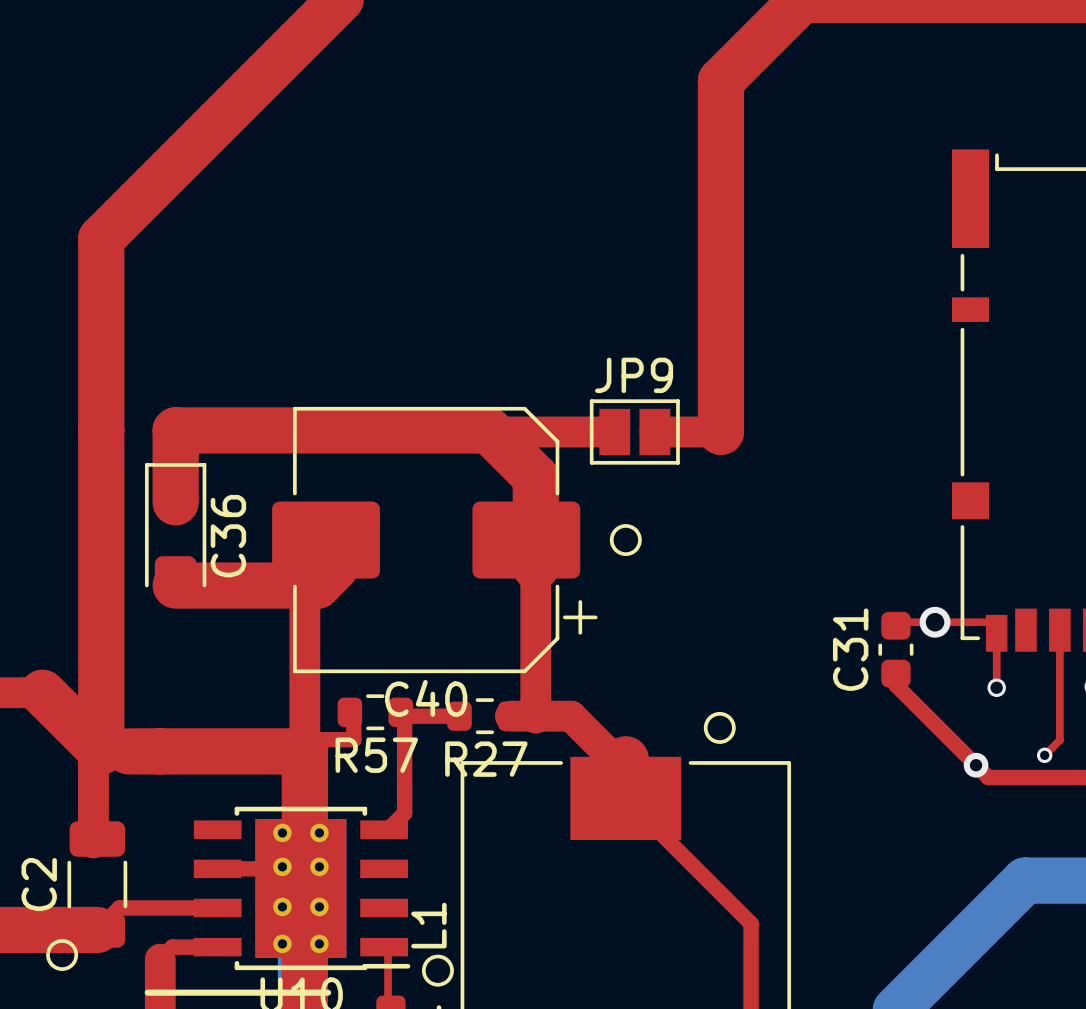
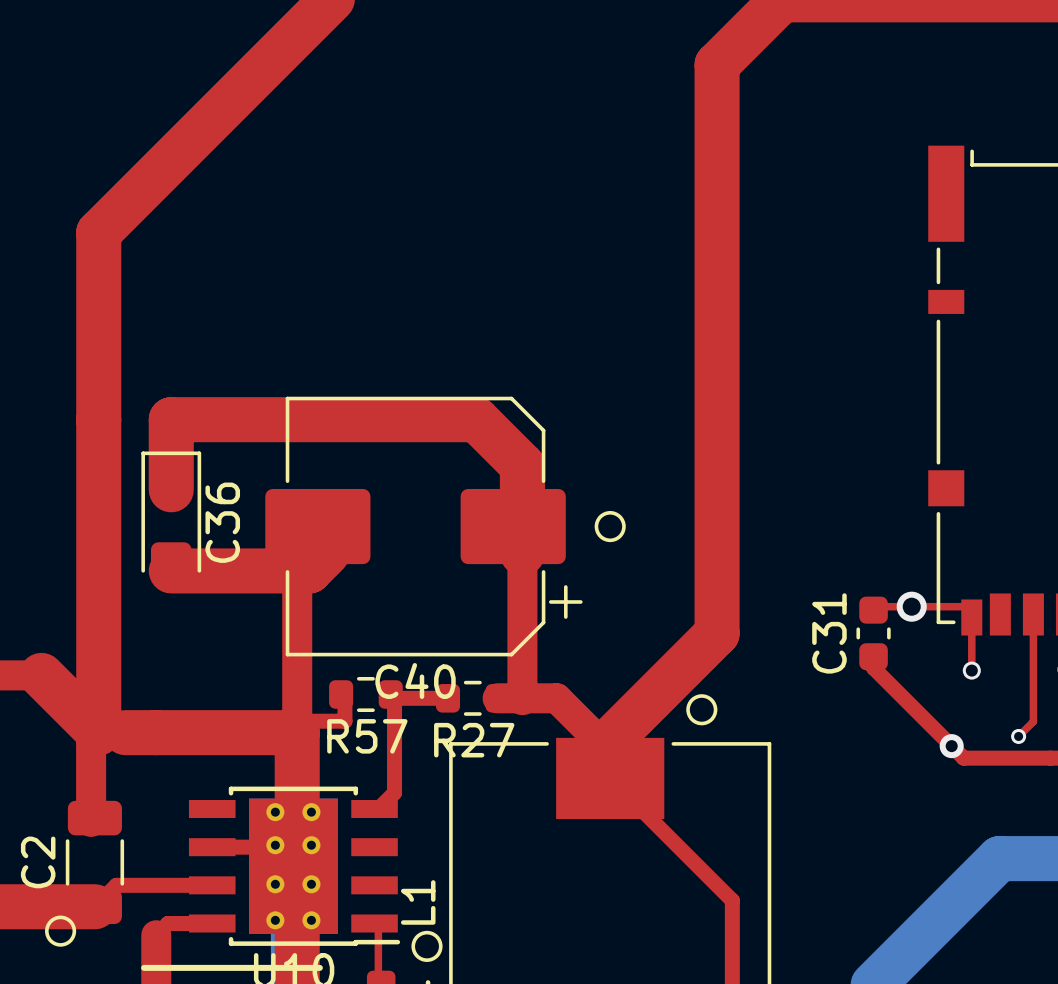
top track: (735, 66) (720, 80) (720, 431) (654, 431) -> (717, 64) (717, 633) (610, 740)
top track: (488, 430) (490, 431) (614, 431) -> none
JP9: (634, 431) -> none

